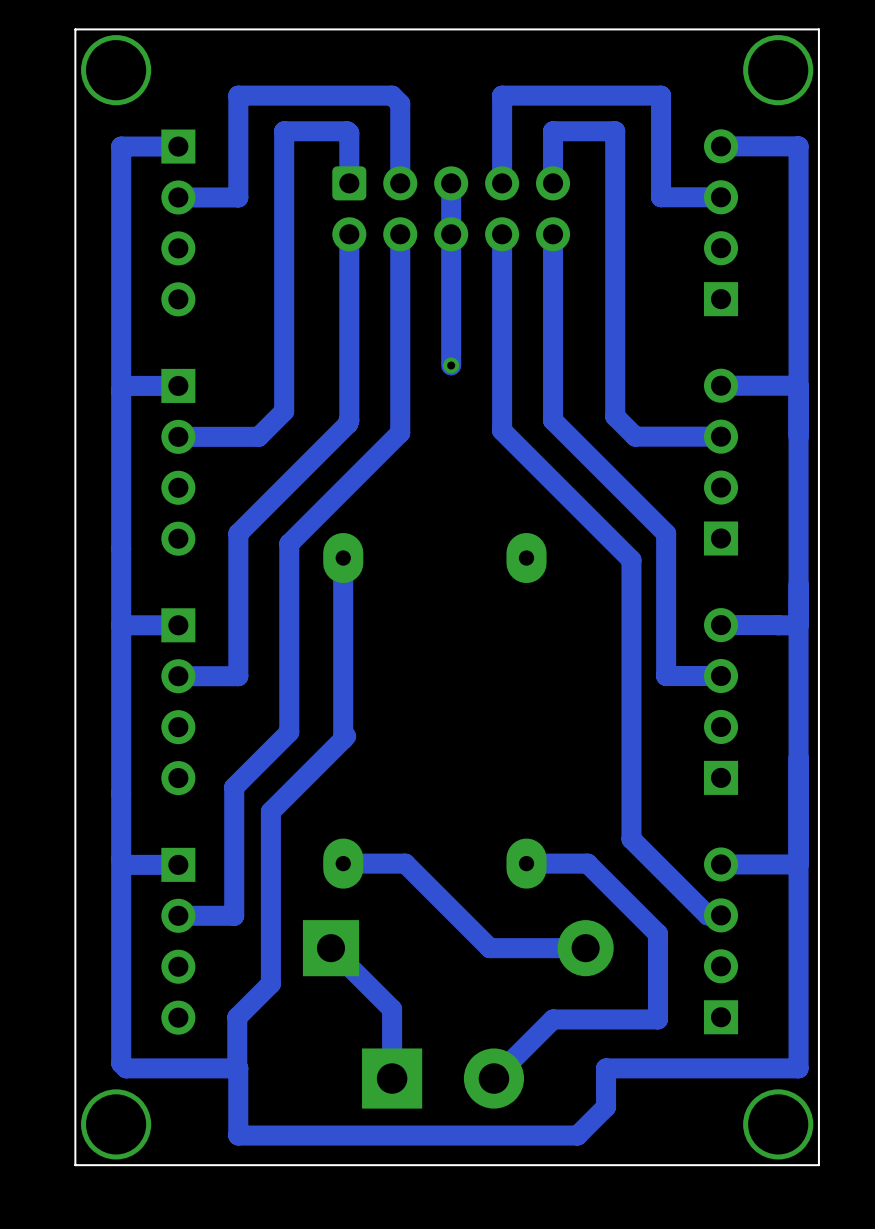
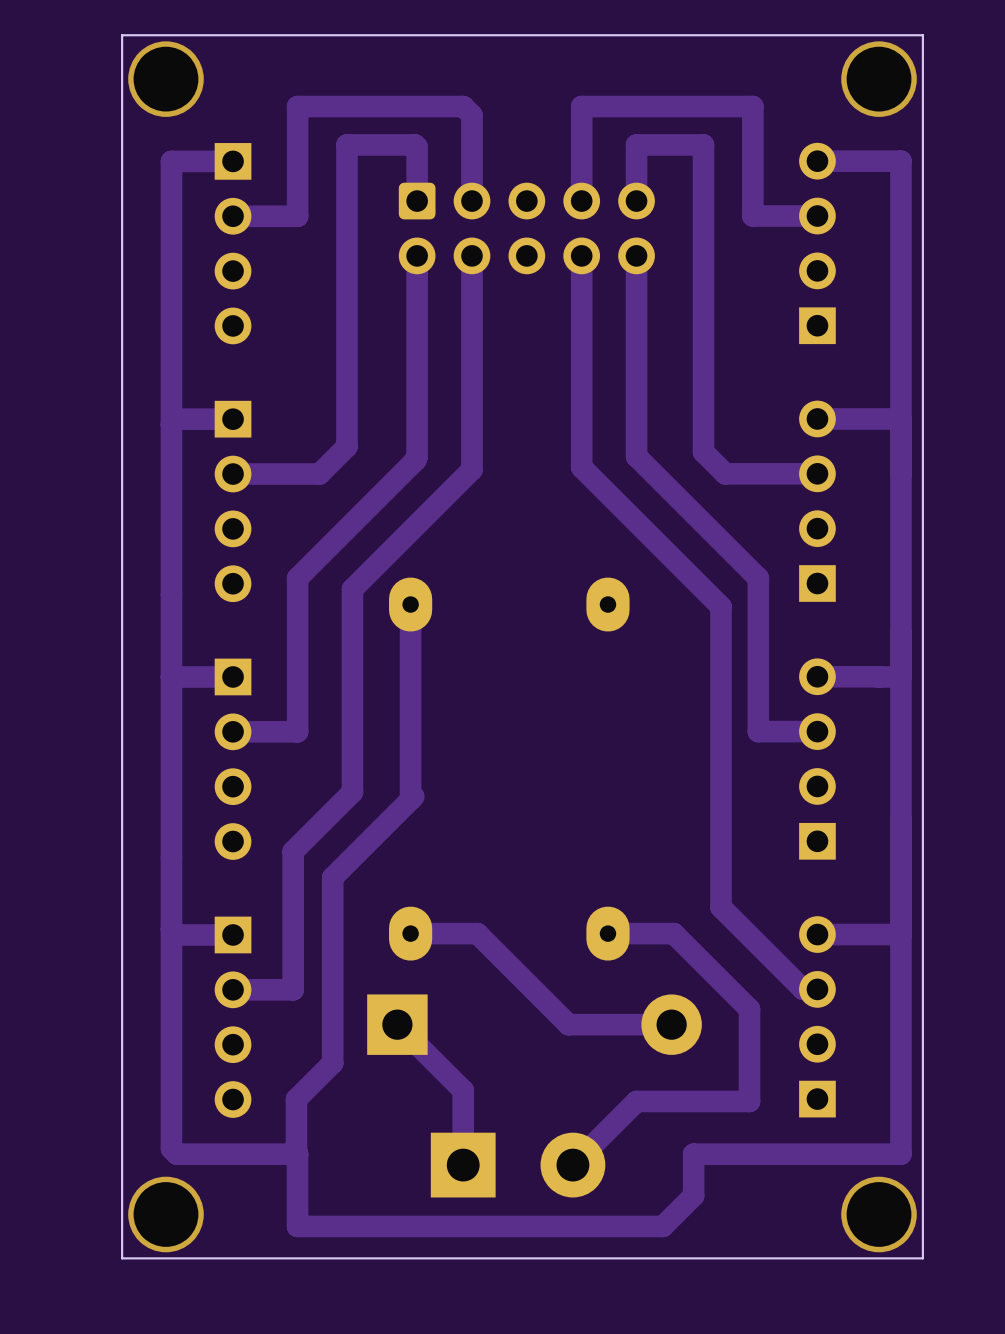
track: (451, 183) (451, 365) -> none
via: (451, 365) -> none

